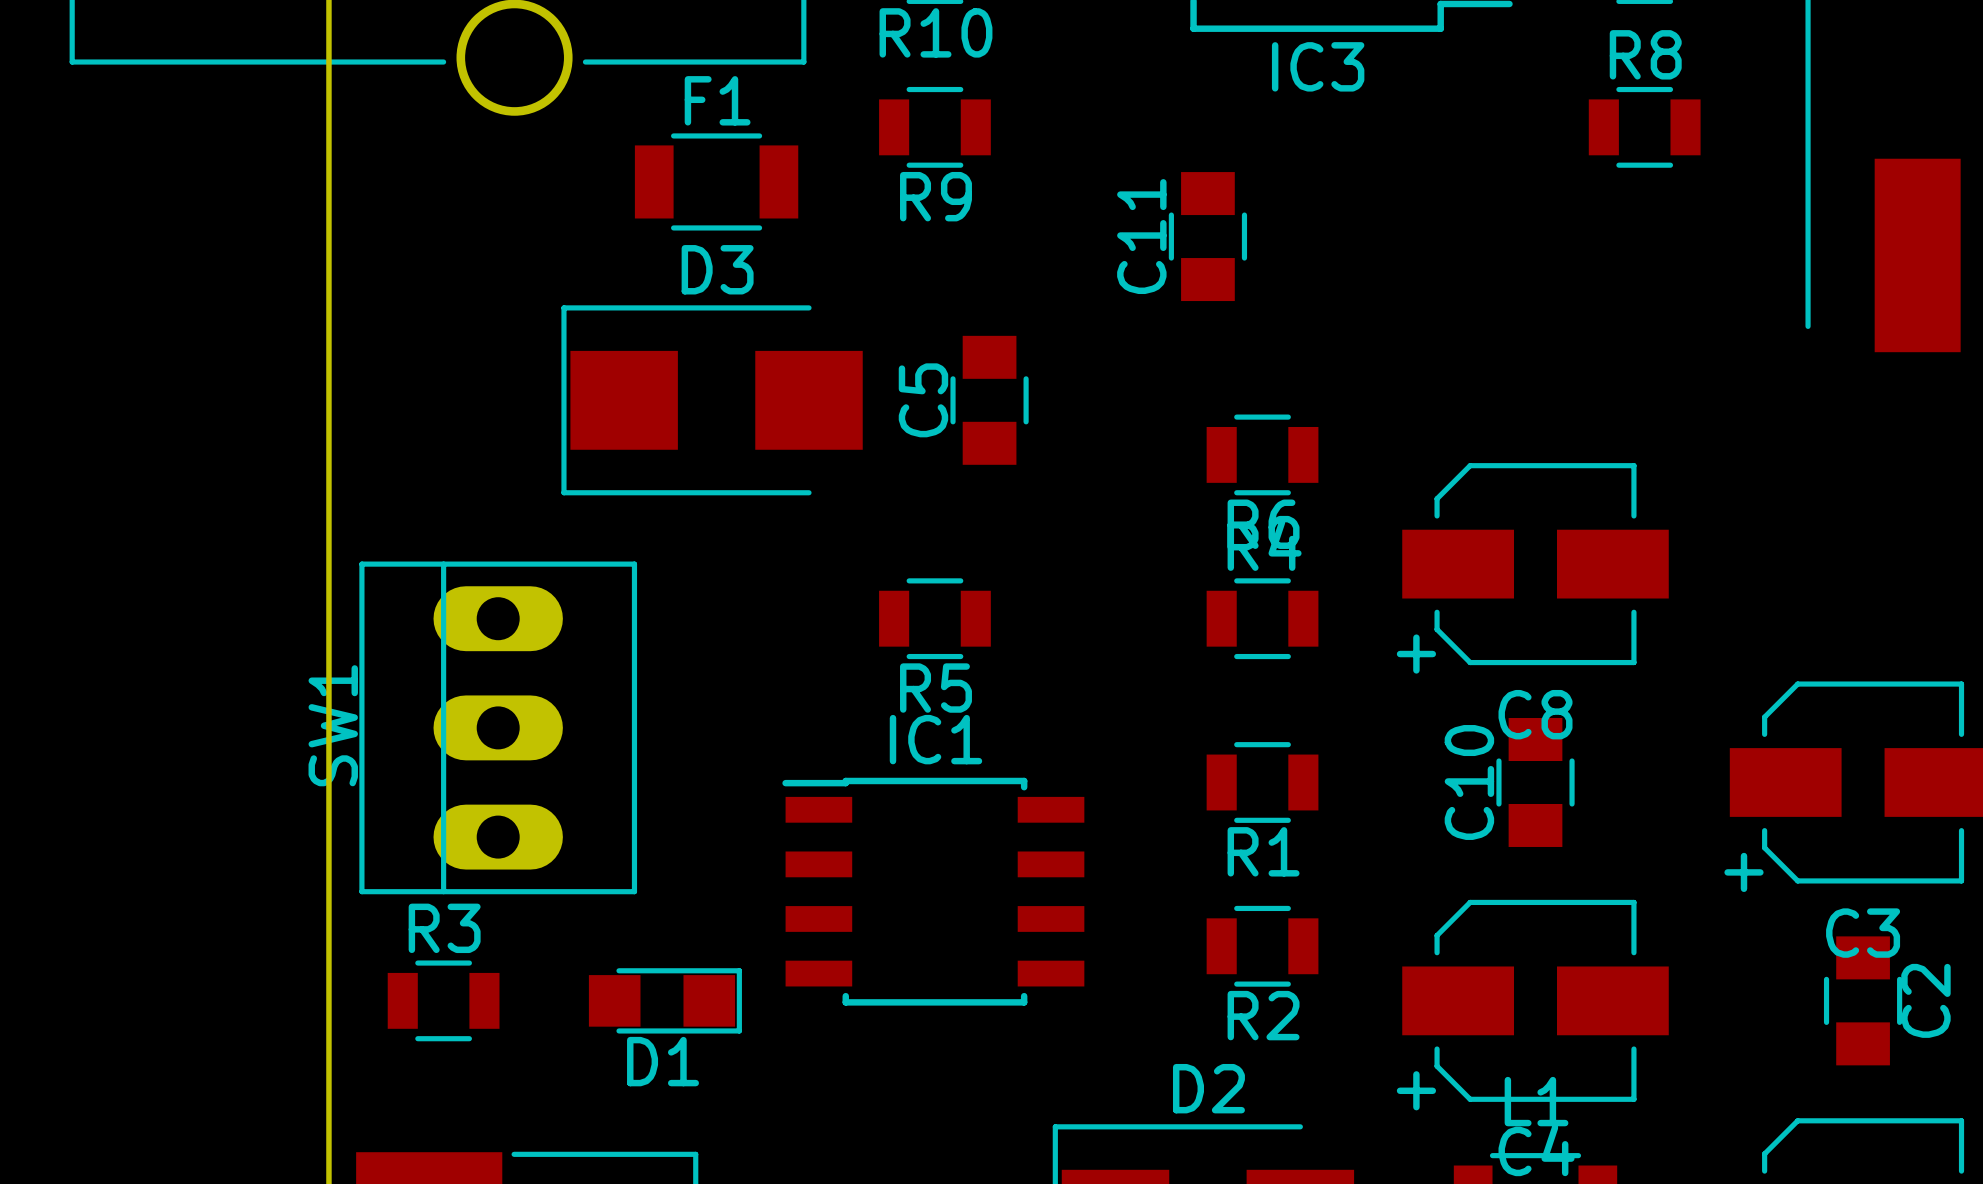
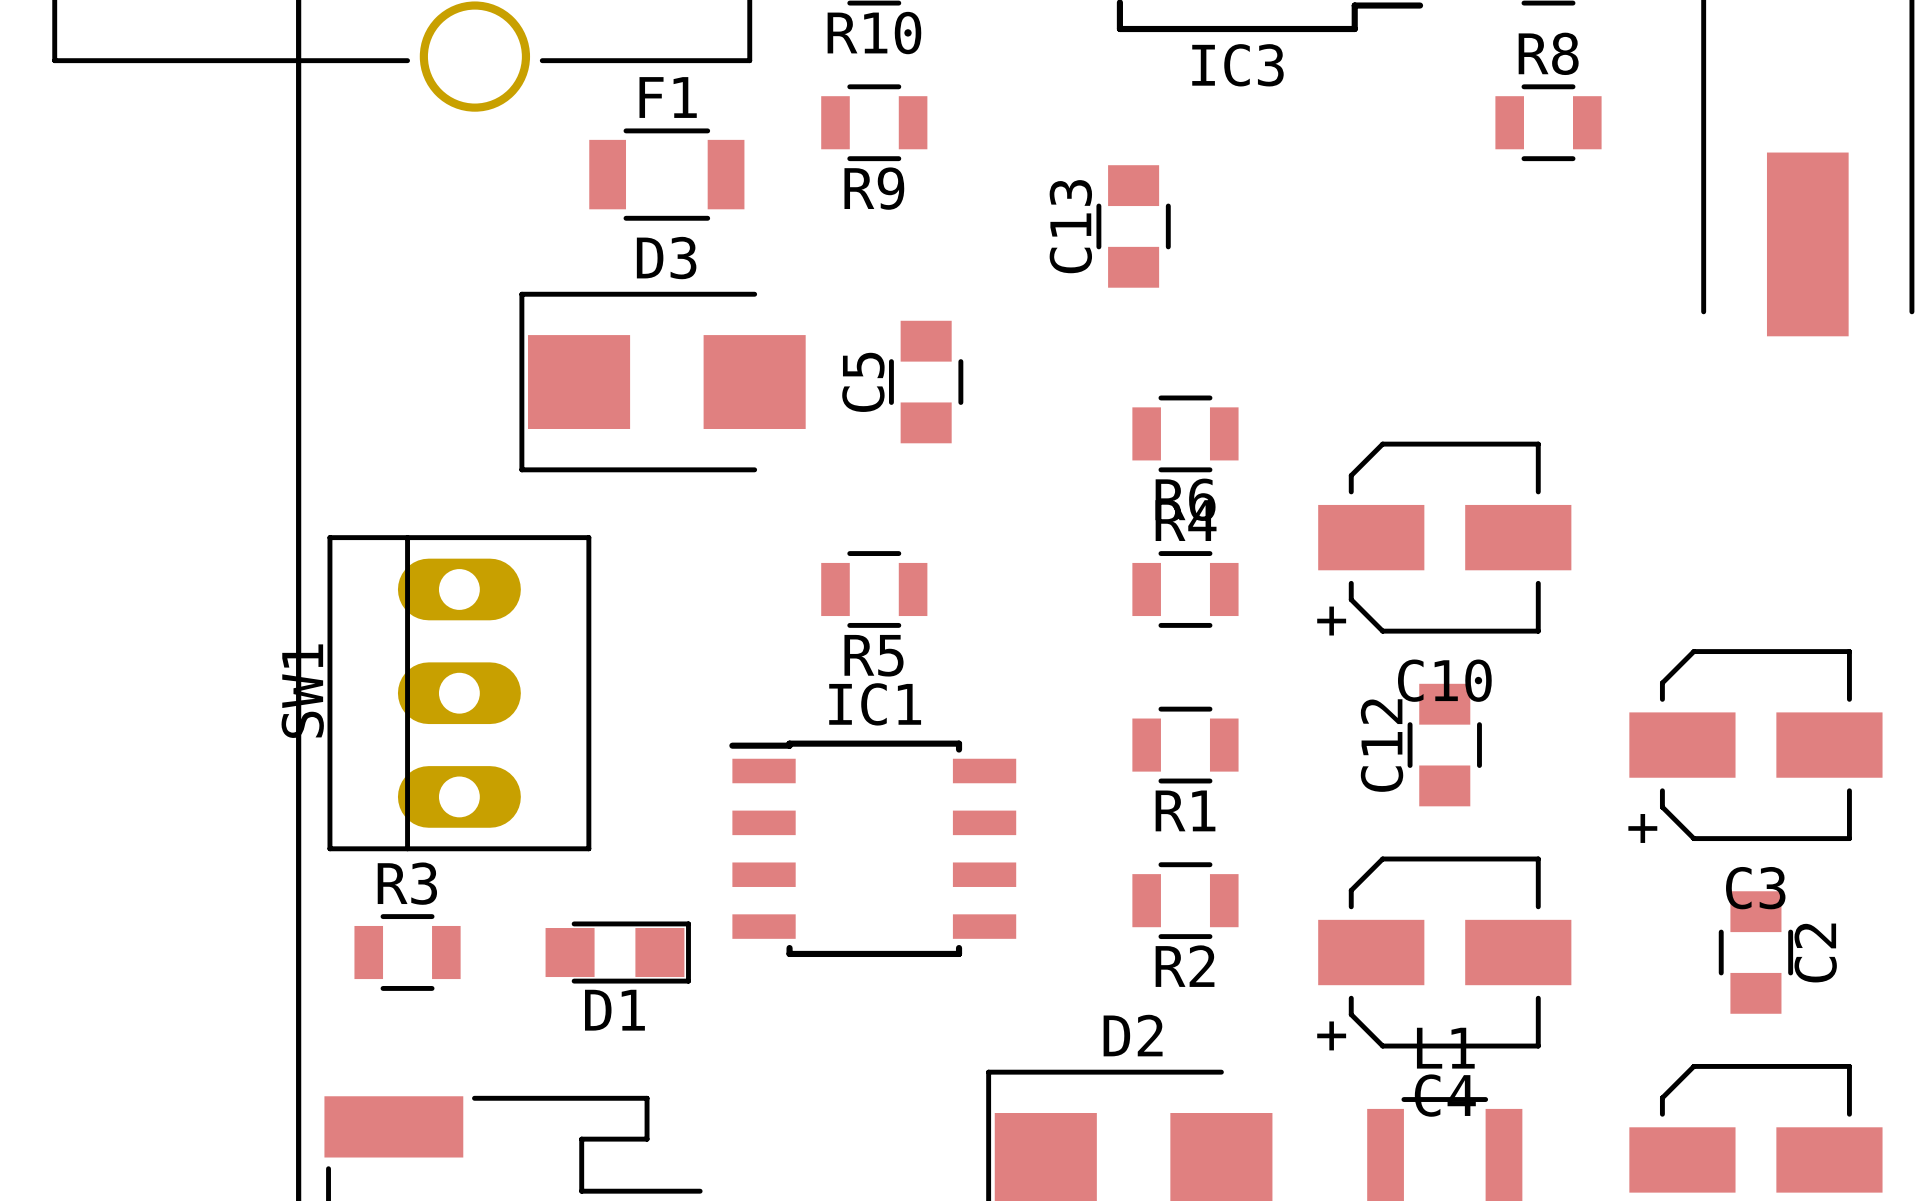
C11 name: C11 (1141, 236) -> C13 (1070, 226)
C8 name: C8 (1535, 714) -> C10 (1444, 680)
C10 name: C10 (1469, 782) -> C12 (1382, 745)

